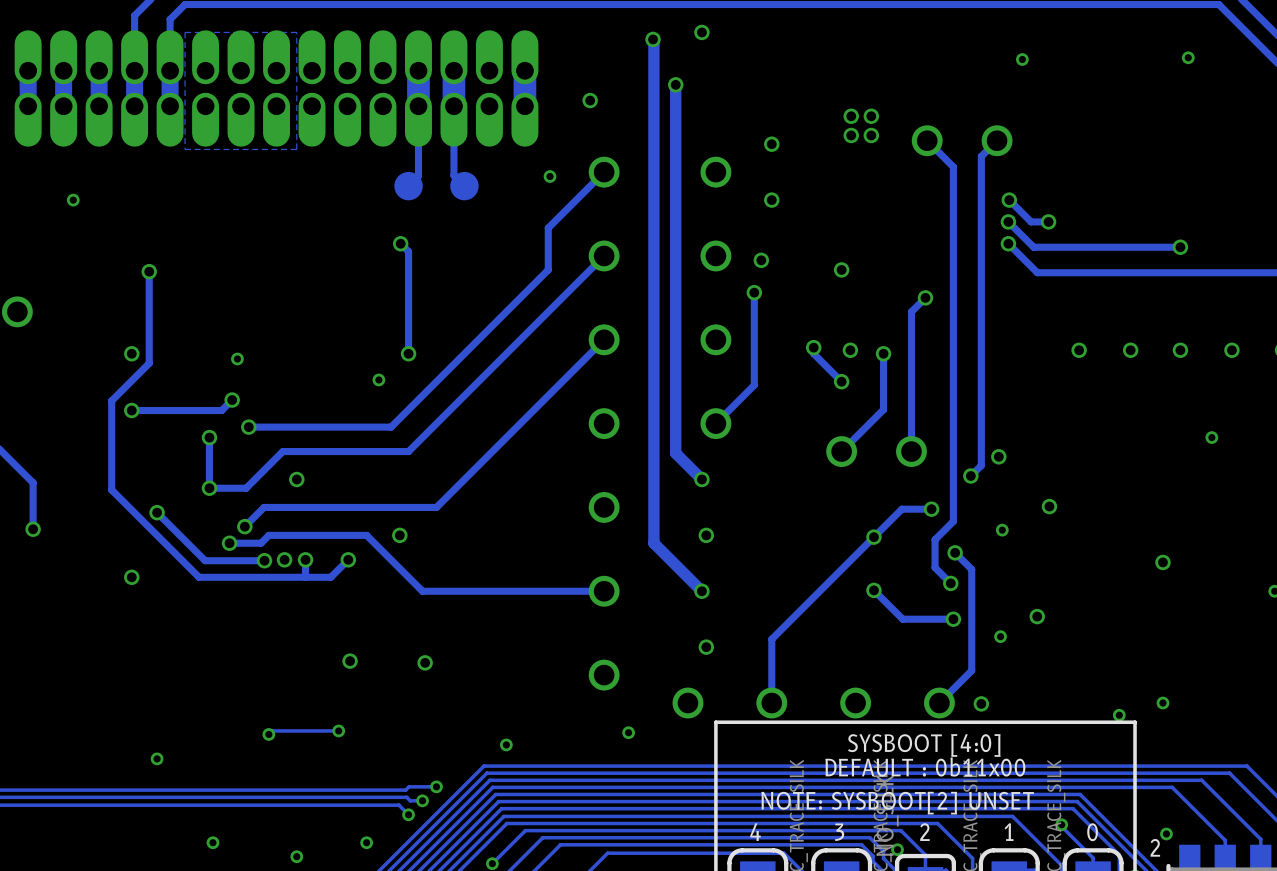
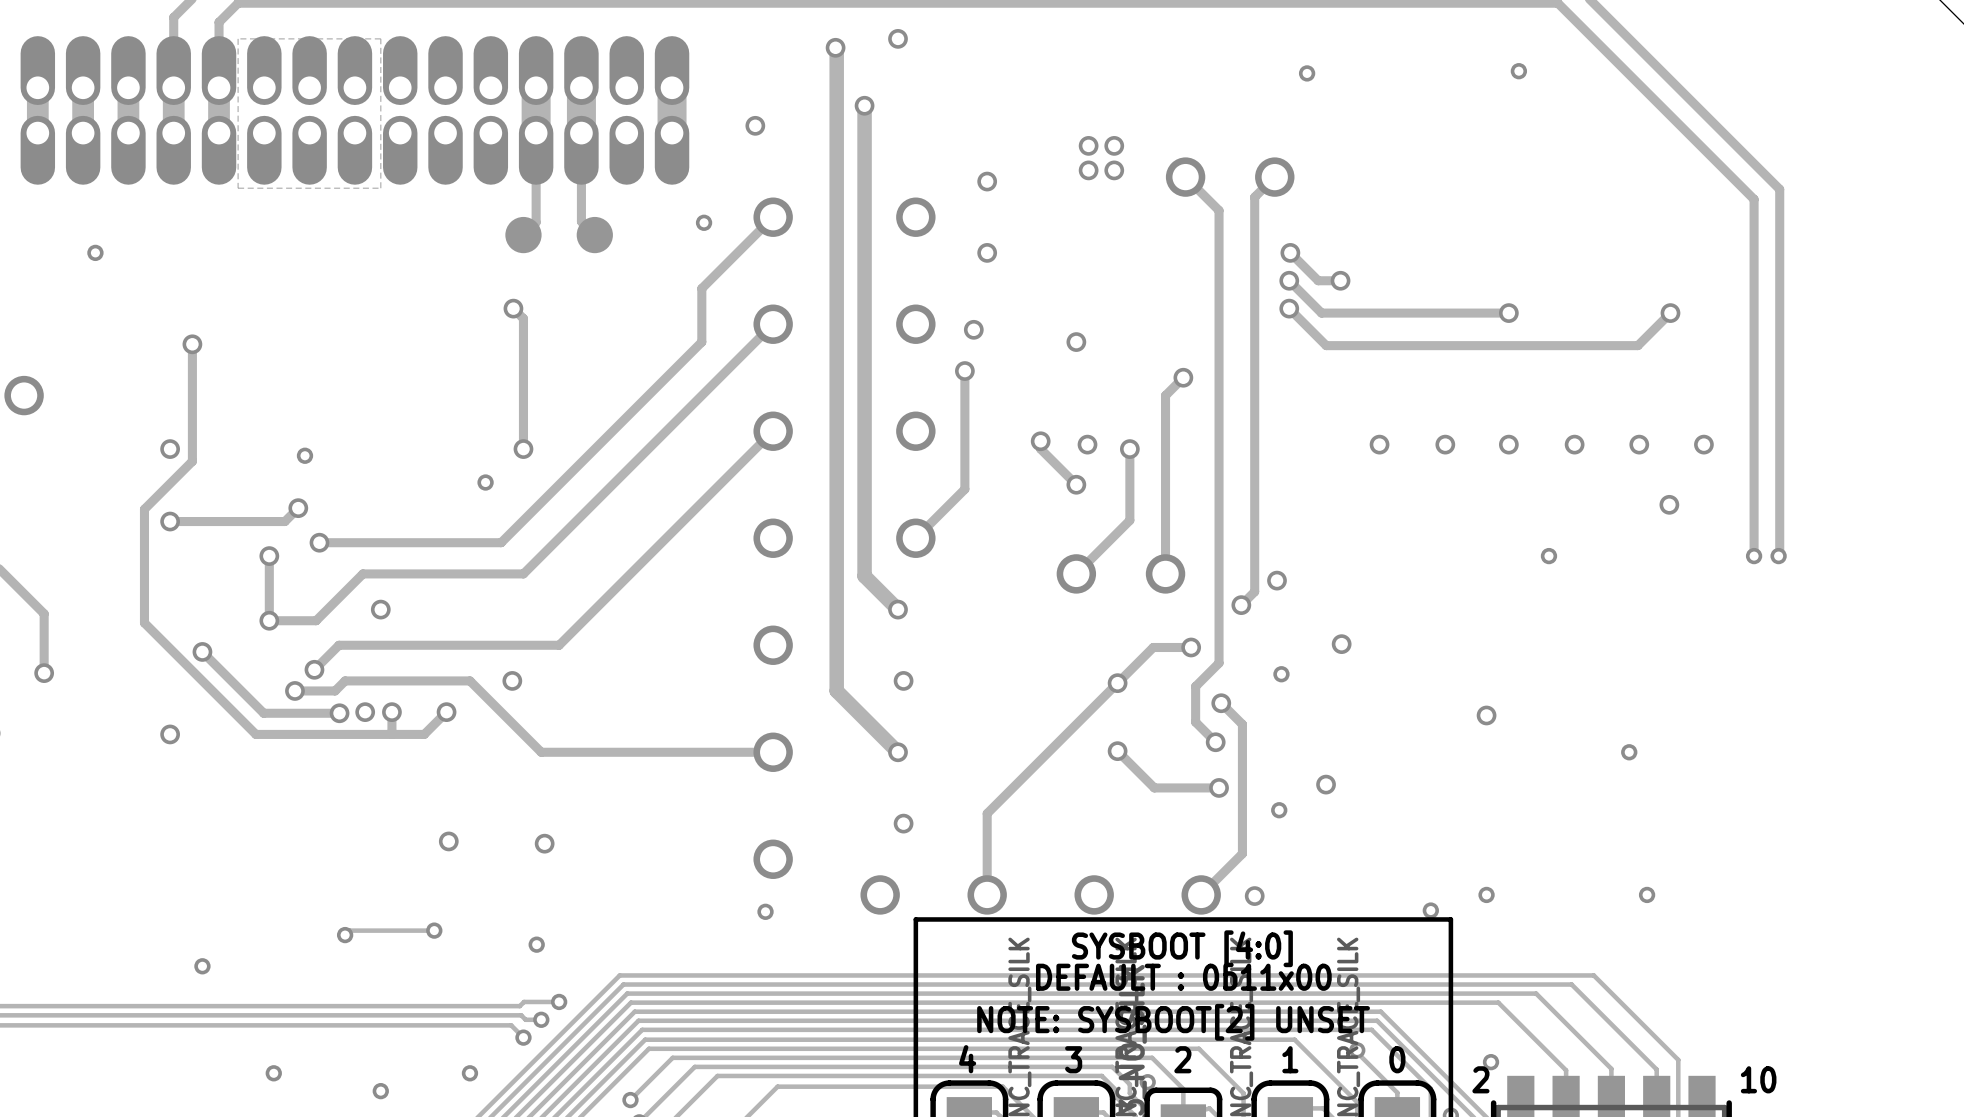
via position: (628, 732) -> (765, 911)
via: none -> (536, 944)
via: (506, 744) -> none

